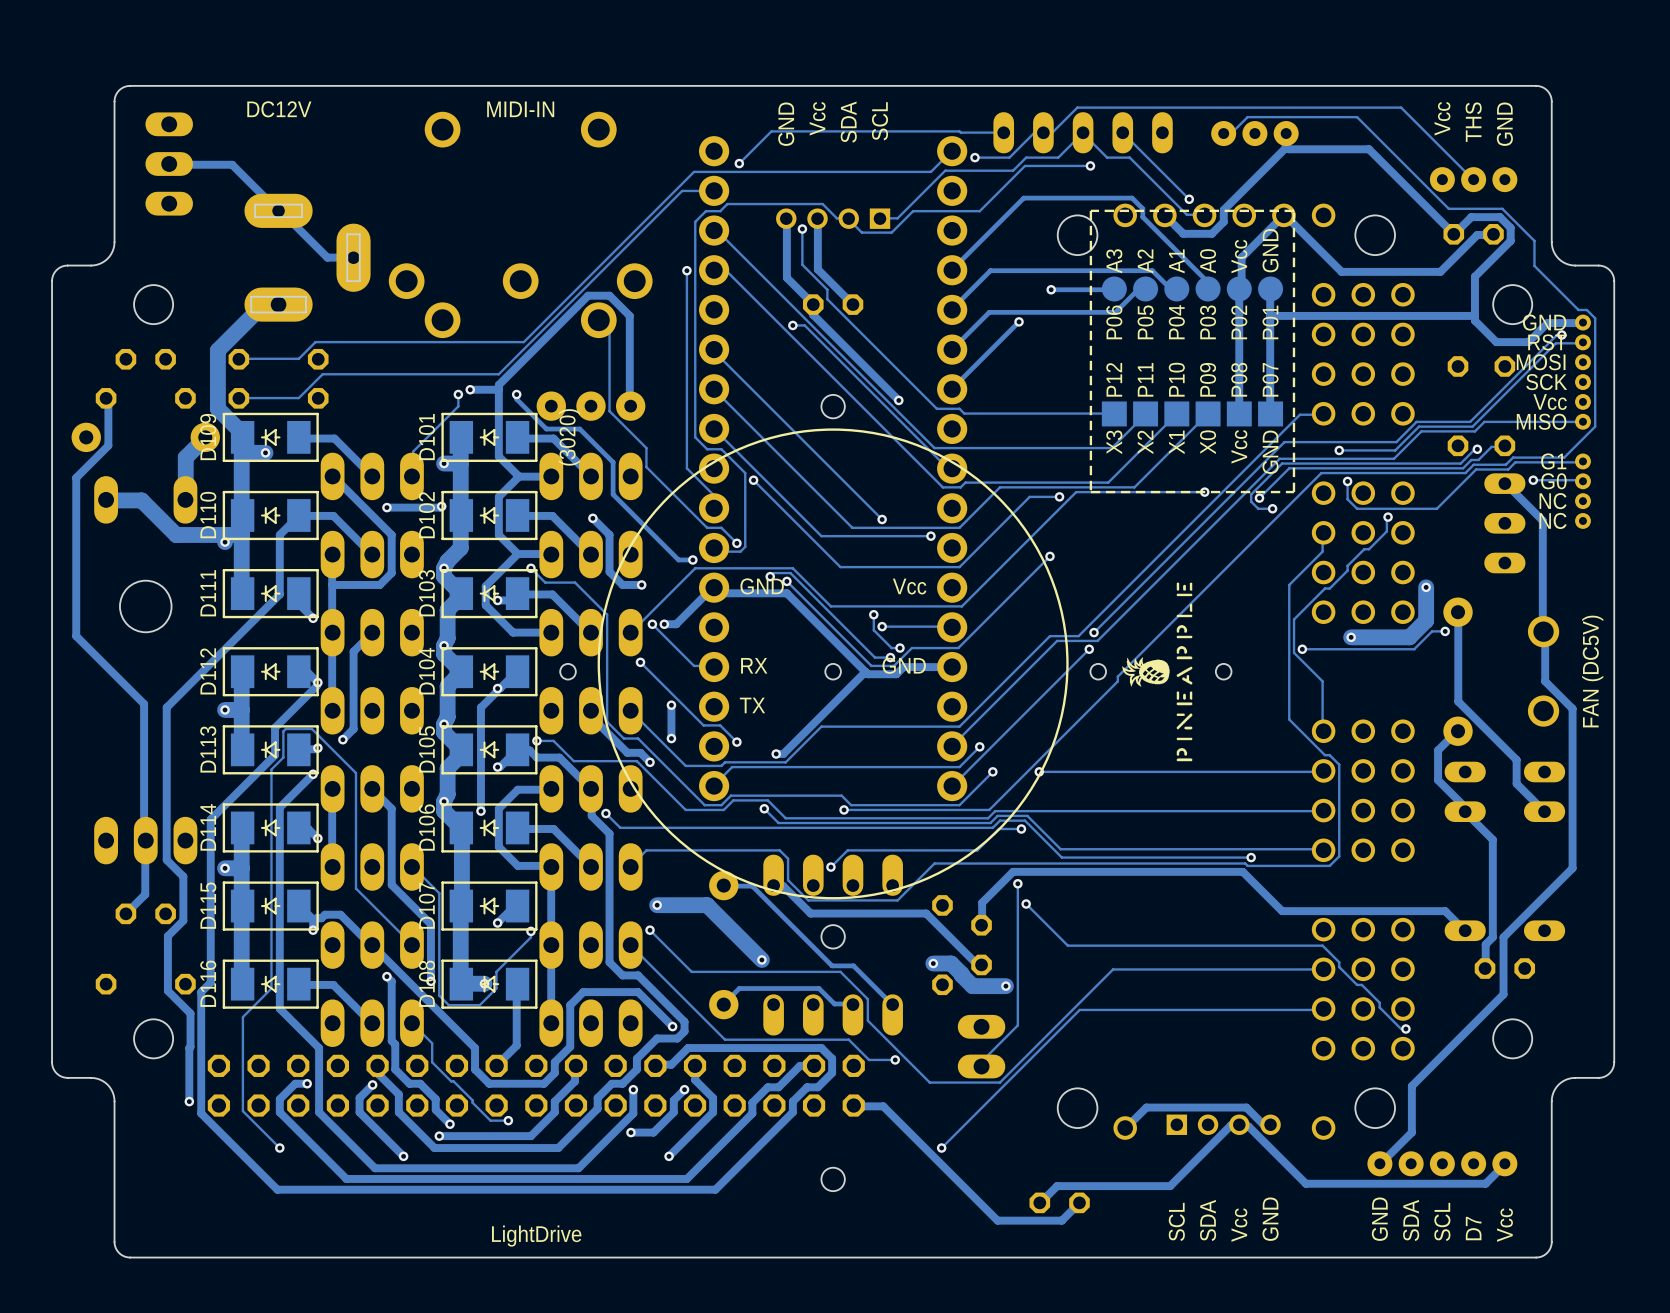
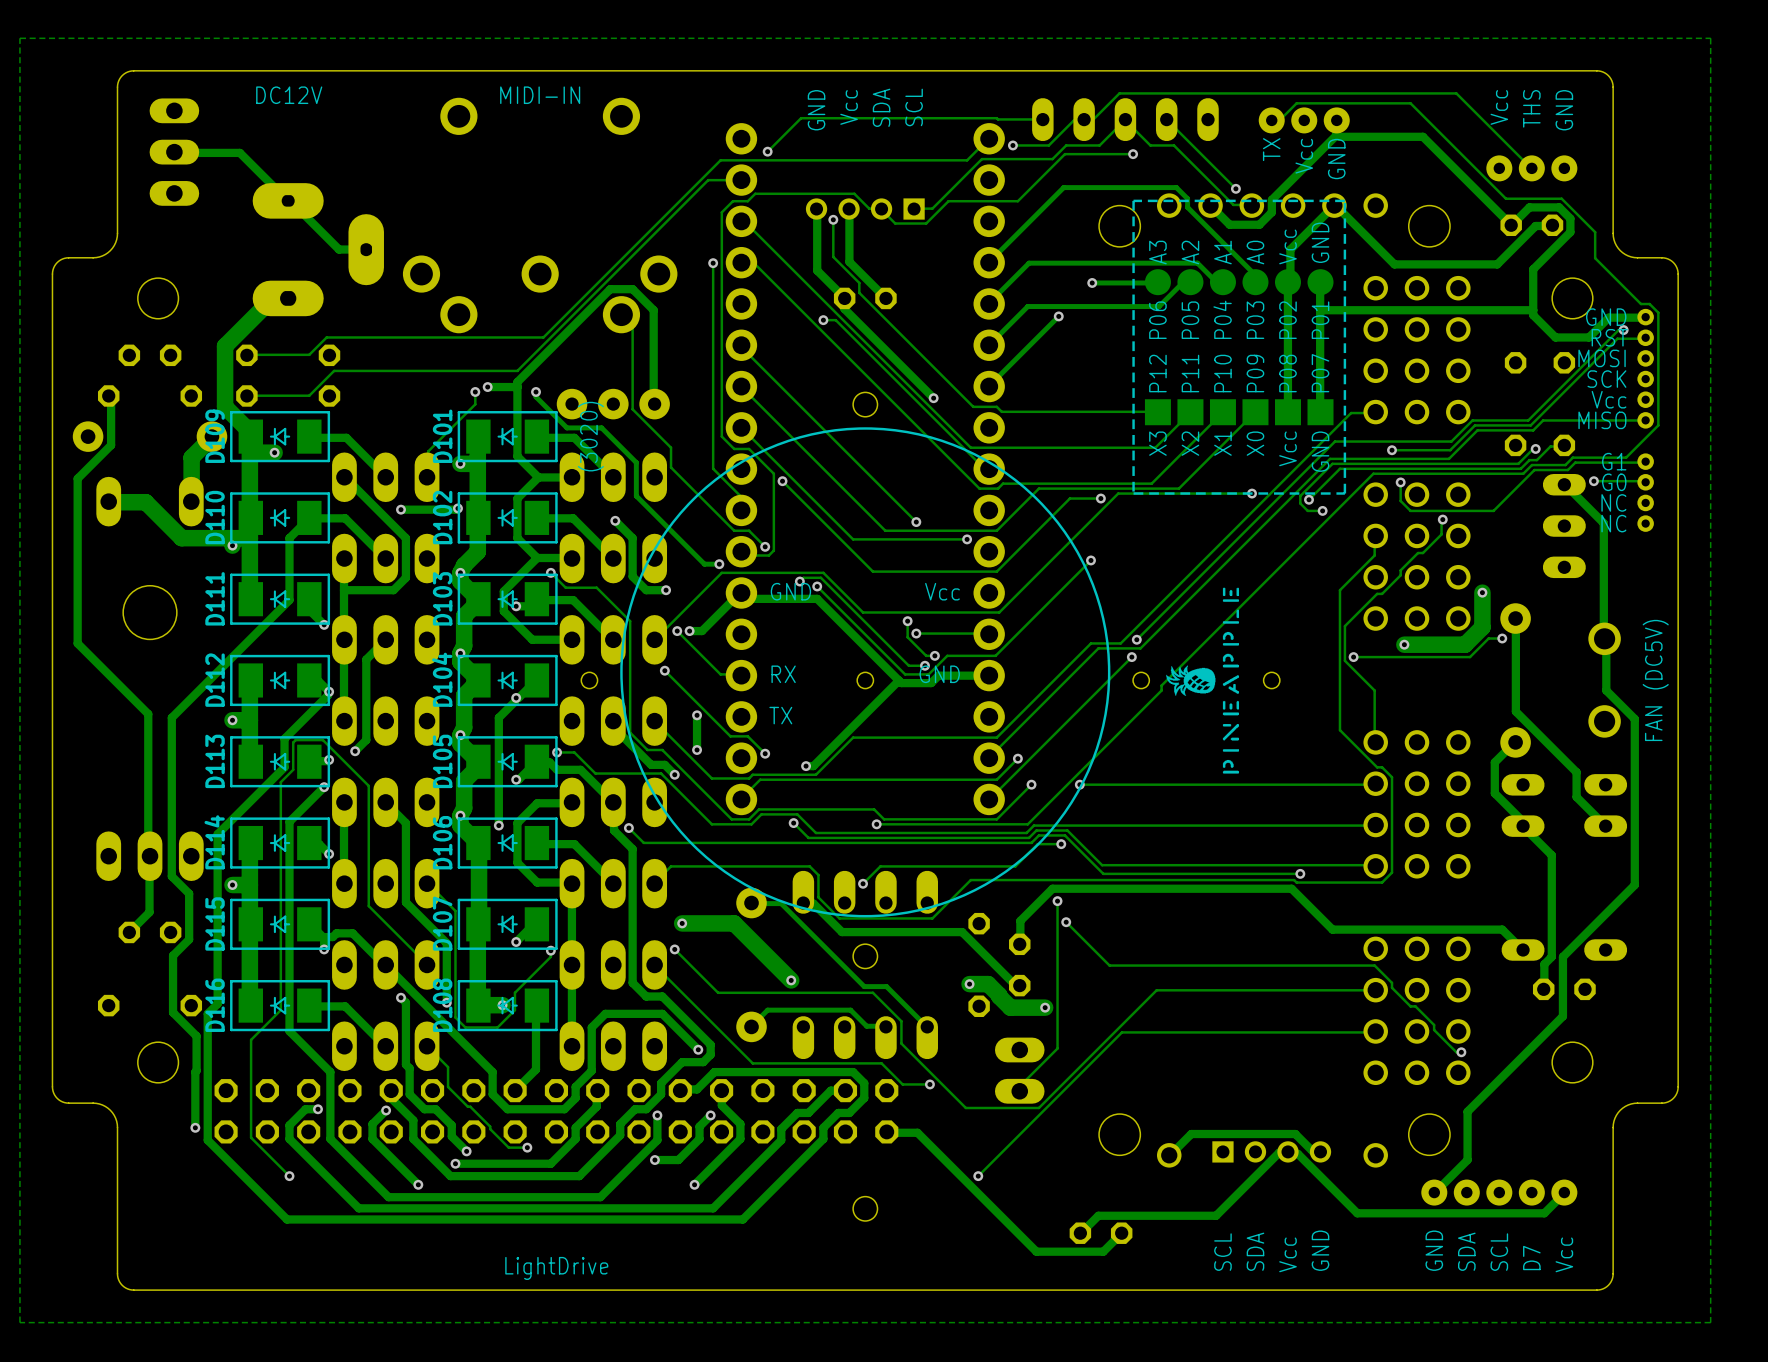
zone outline: none -> (1710, 38) (19, 38) (19, 1322) (1710, 1322) (1710, 38)
text: none -> TX (1271, 149)
text: none -> Vcc (1304, 156)
text: none -> GND (1336, 159)

